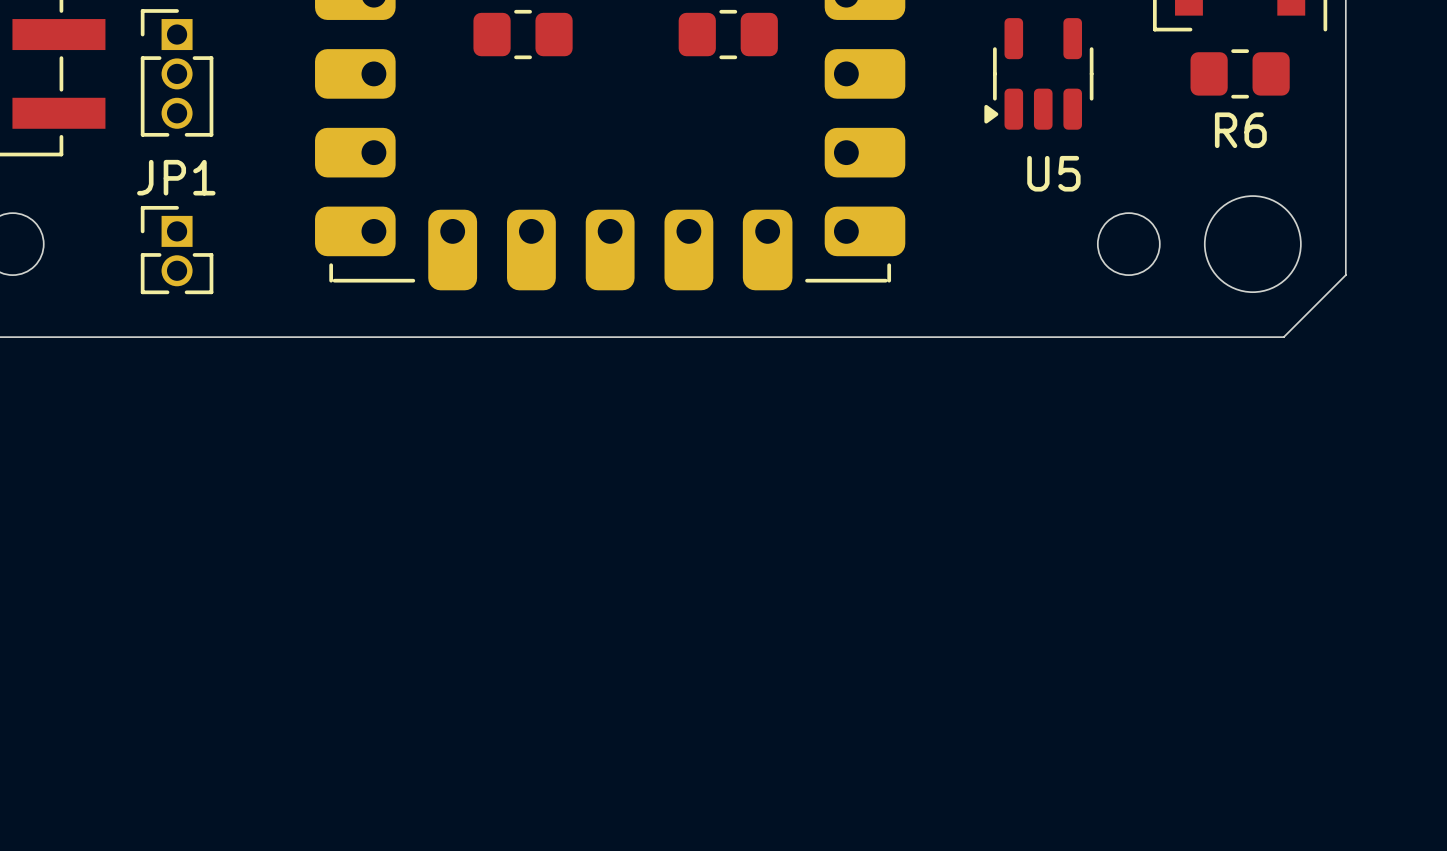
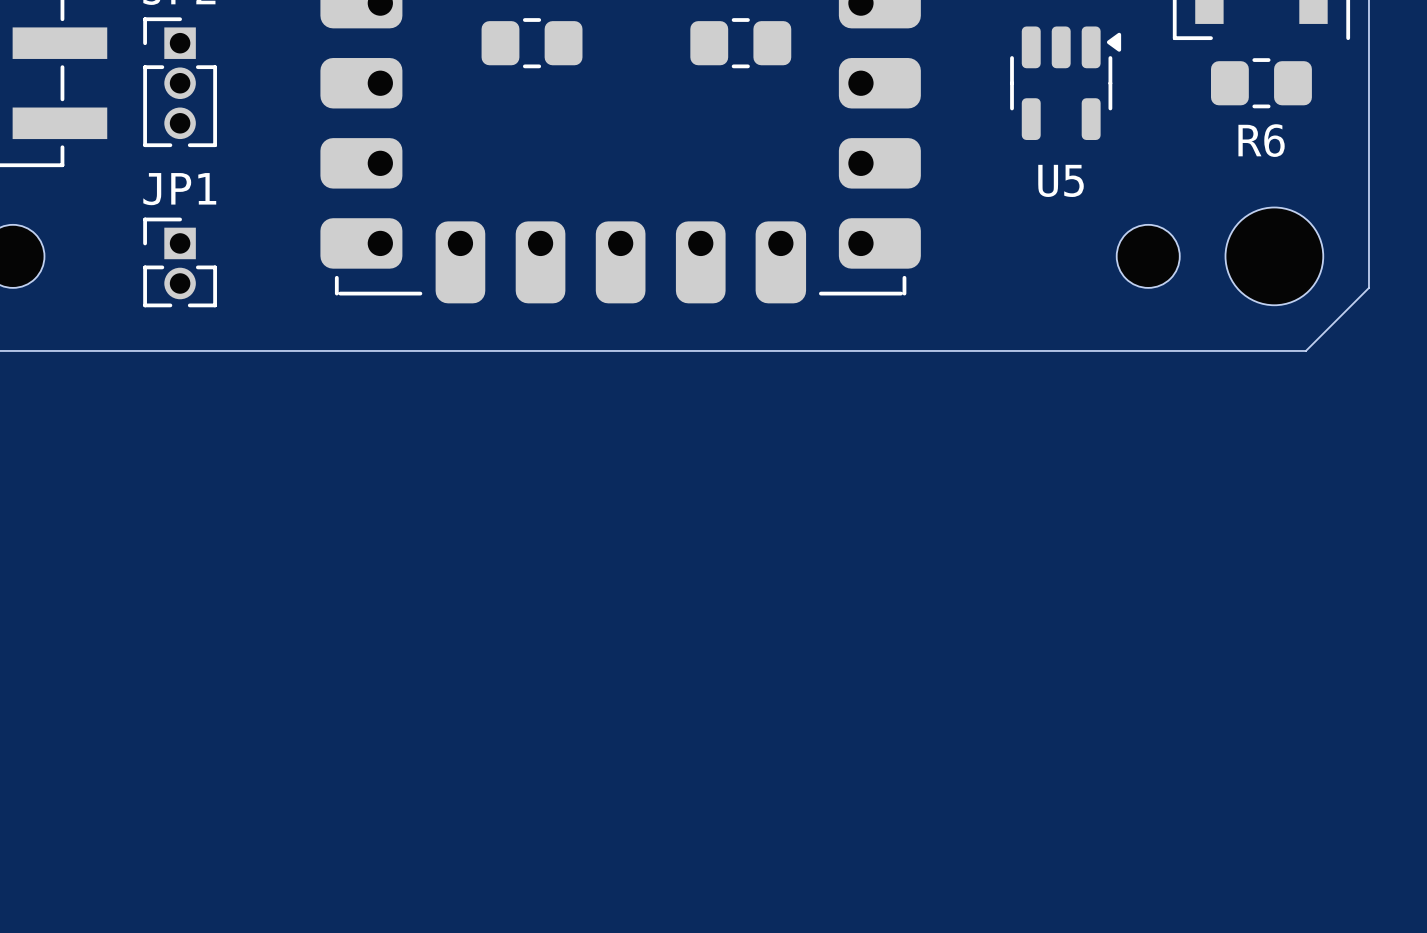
U5 rotation: 0° (1038, 73) -> 180° (1065, 83)

